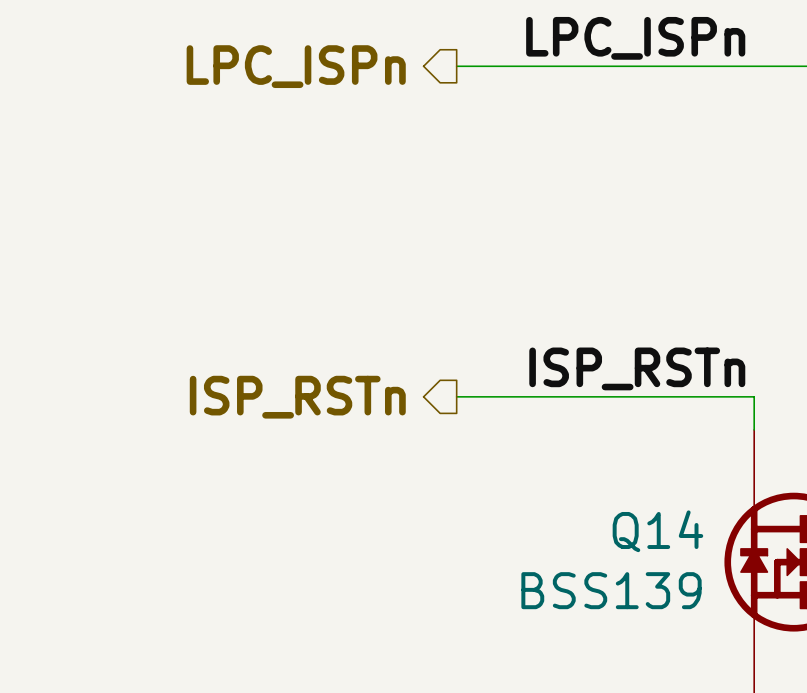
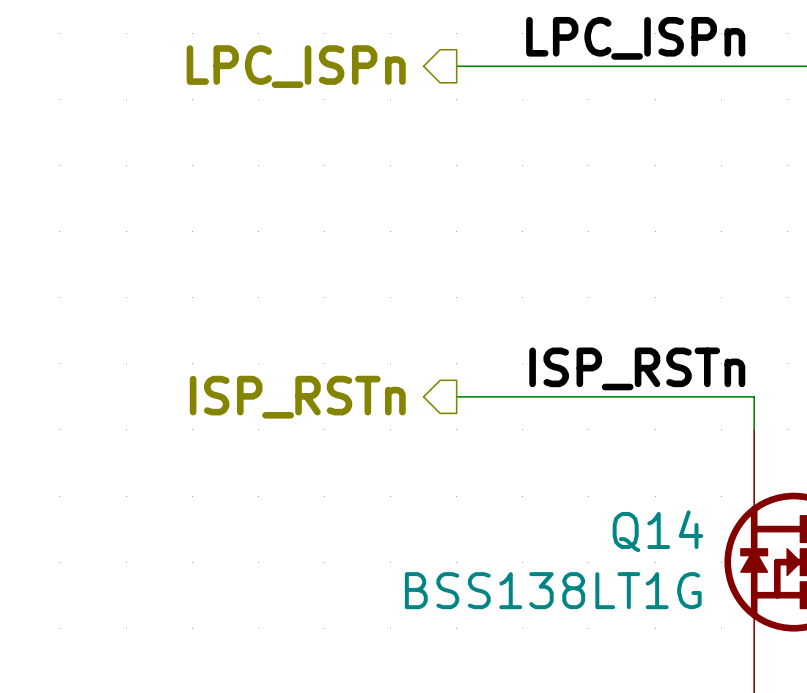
Q14 value: BSS139 (611, 590) -> BSS138LT1G (553, 590)

